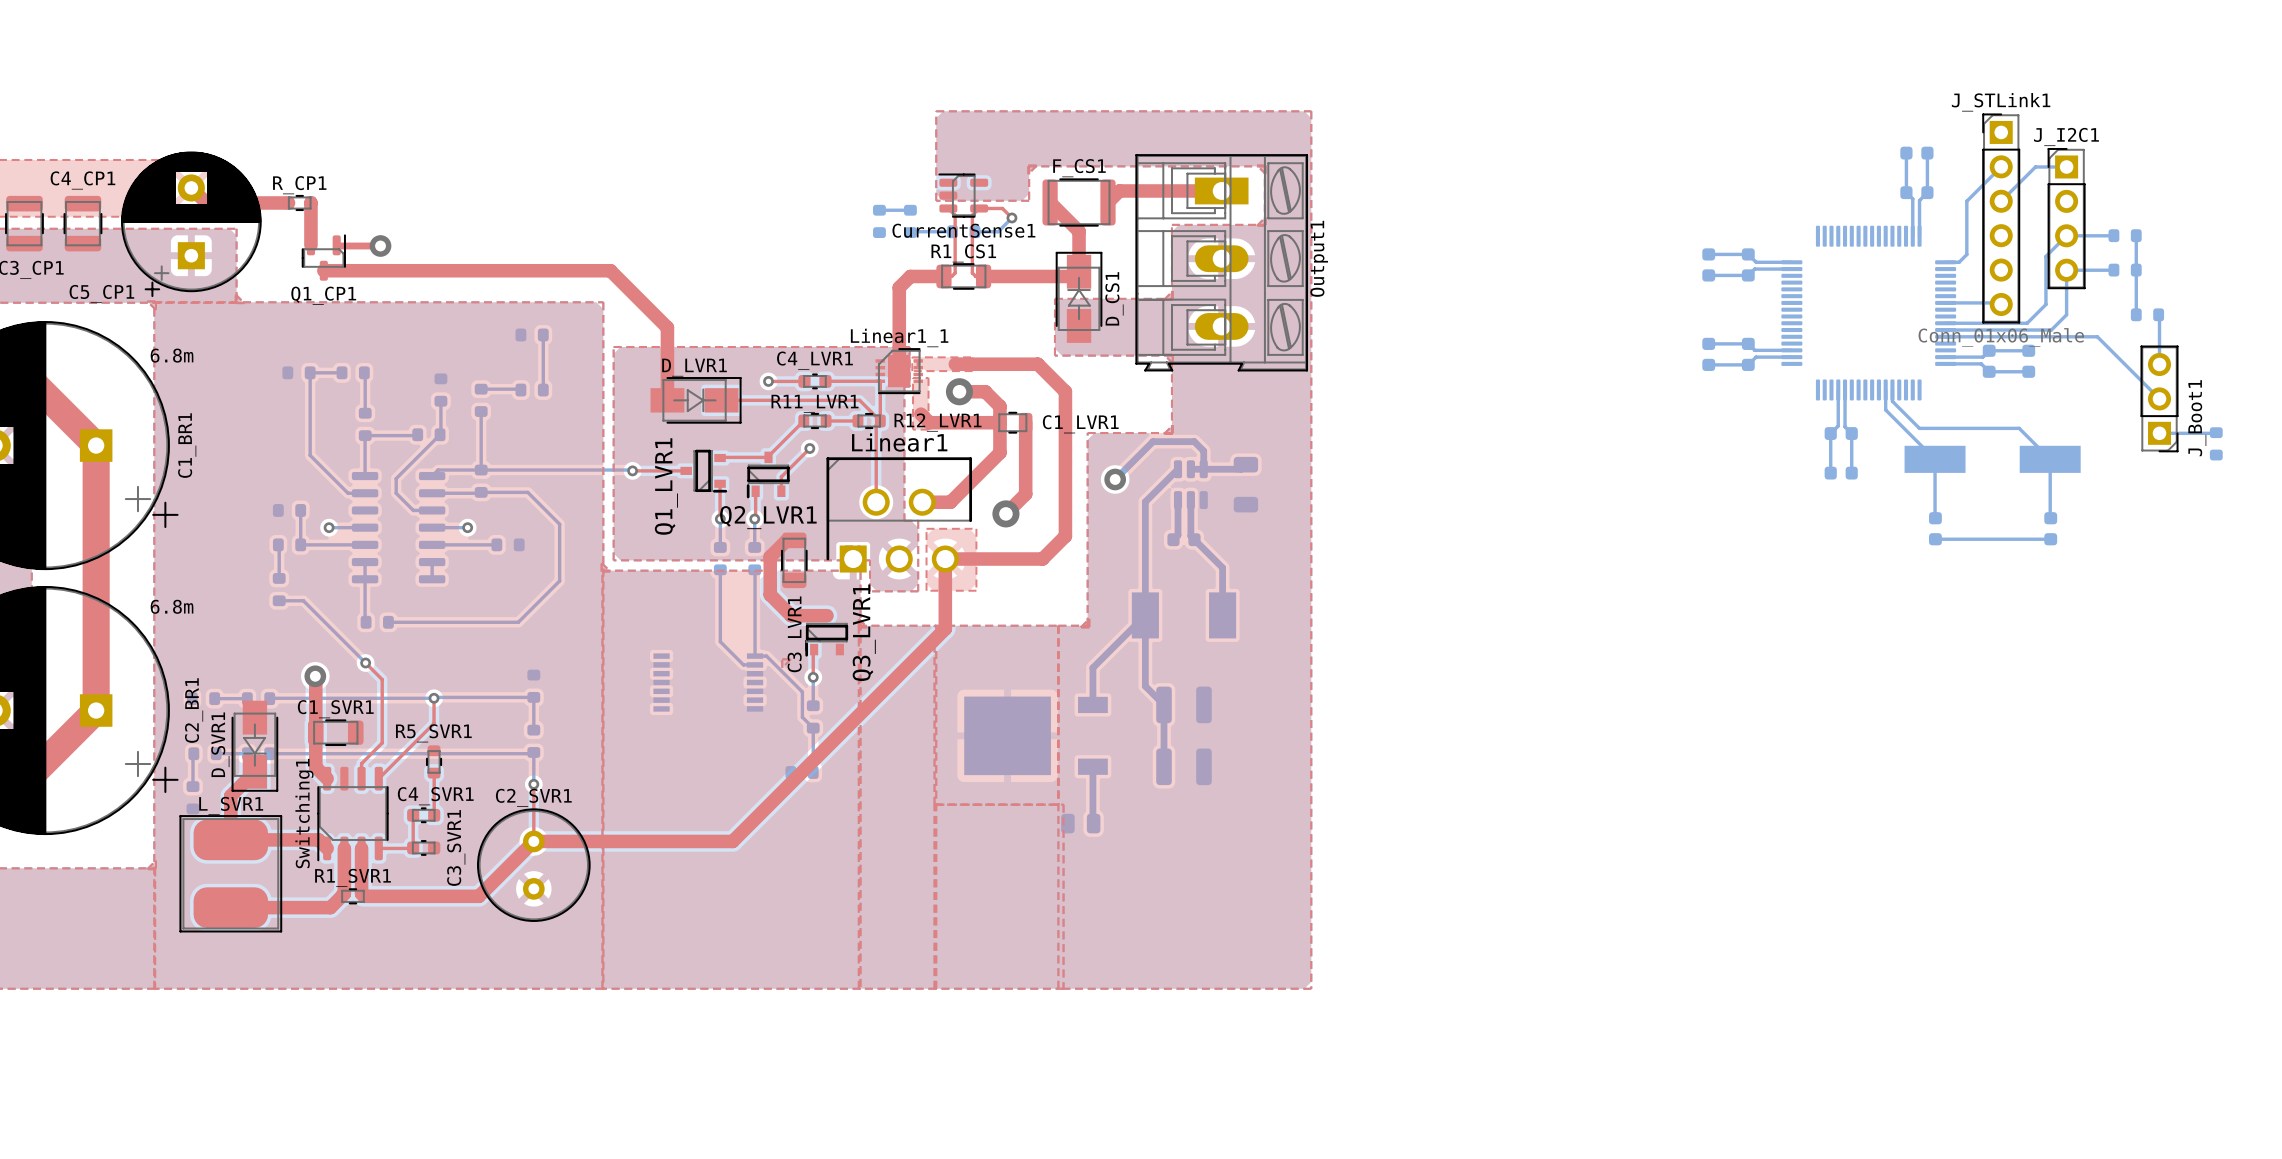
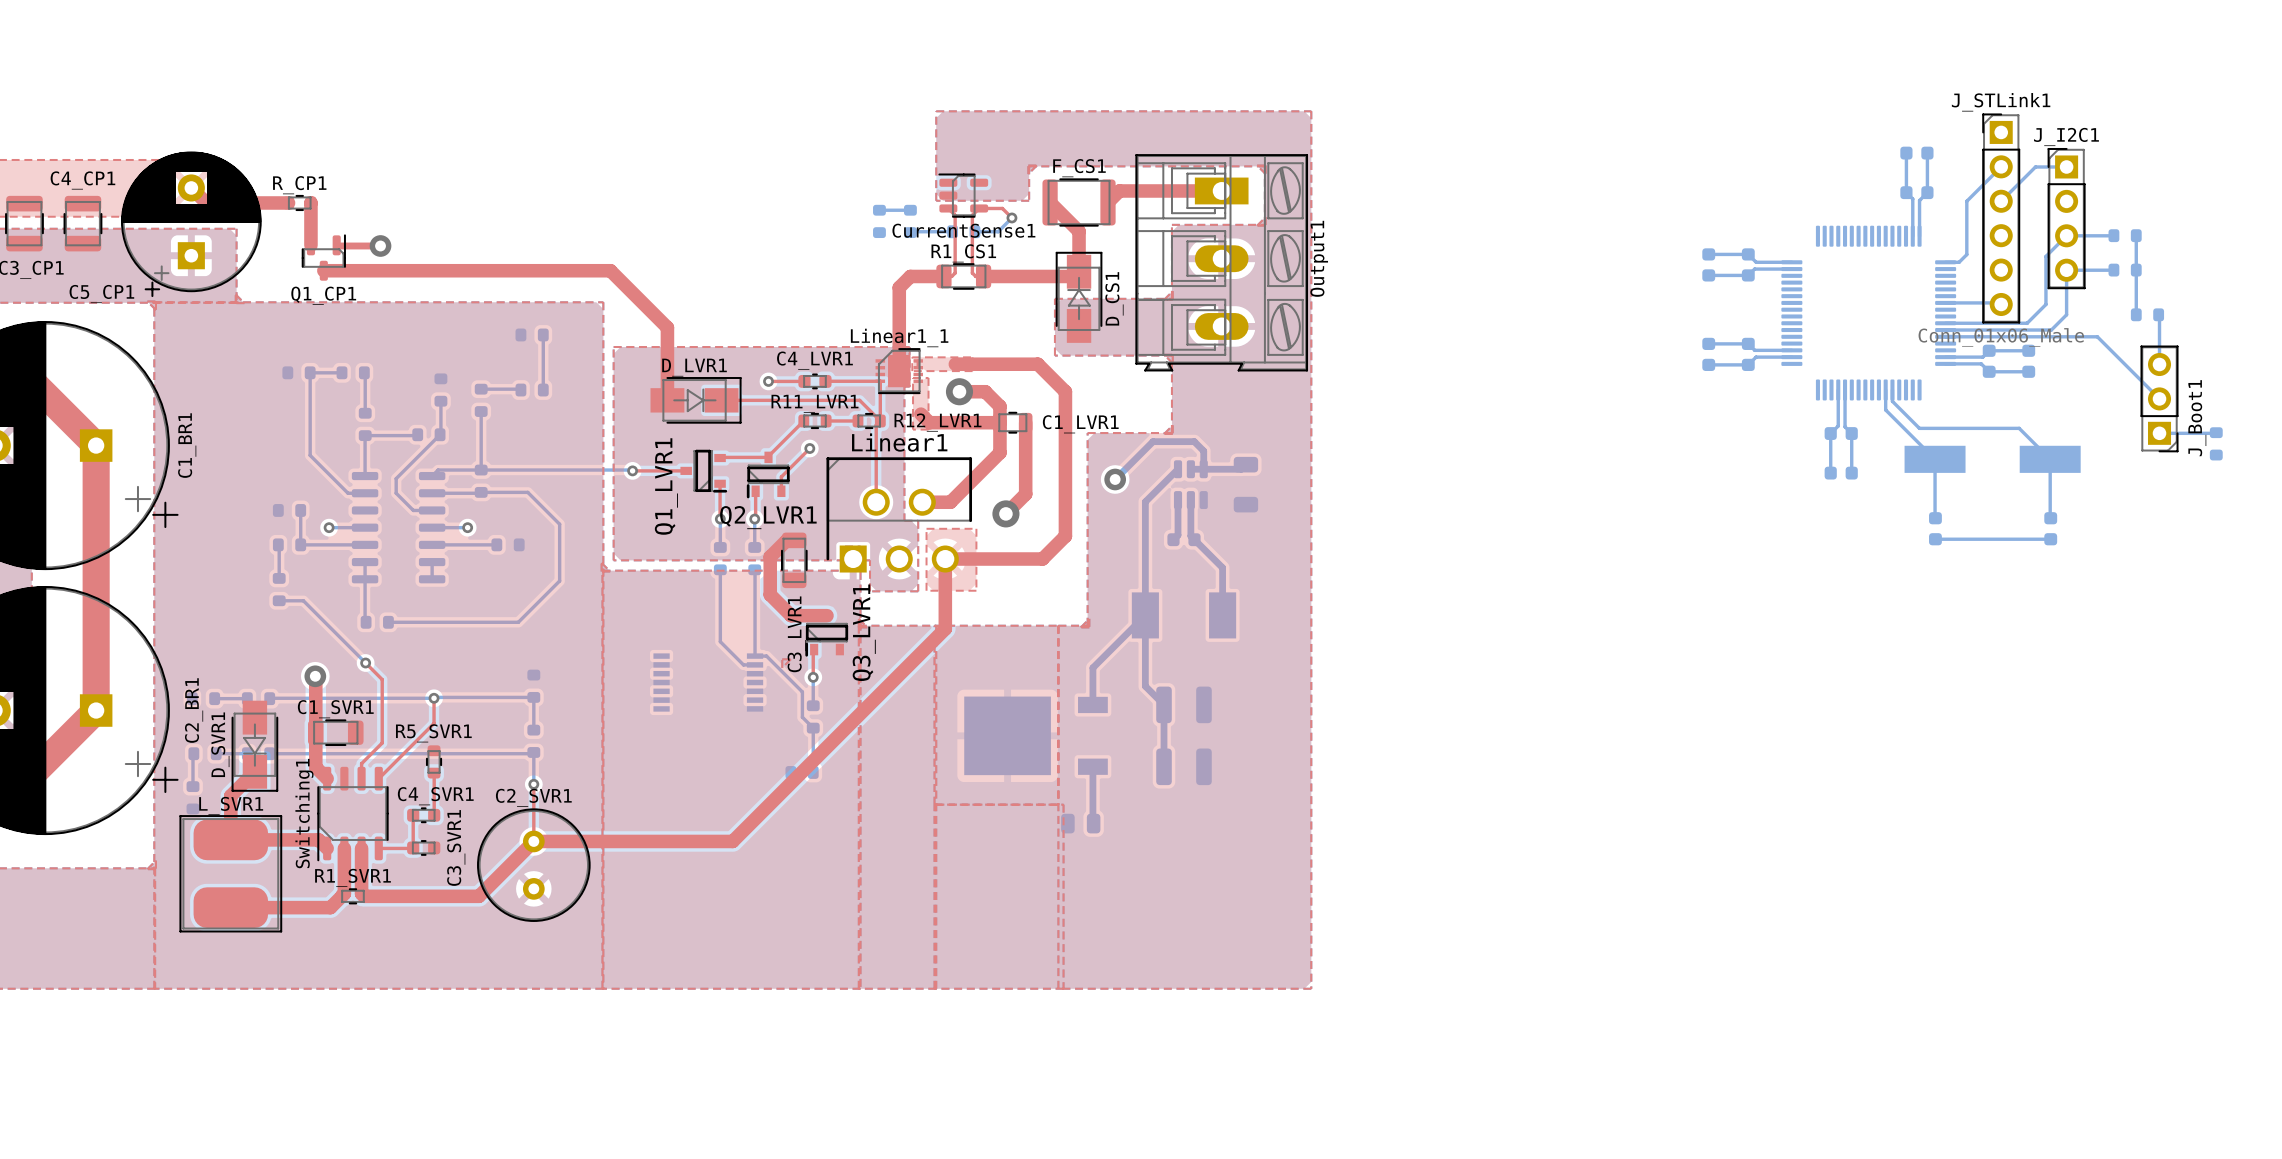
C1_BR1 value: 6.8m (172, 355) -> none
C2_BR1 value: 6.8m (172, 606) -> none

